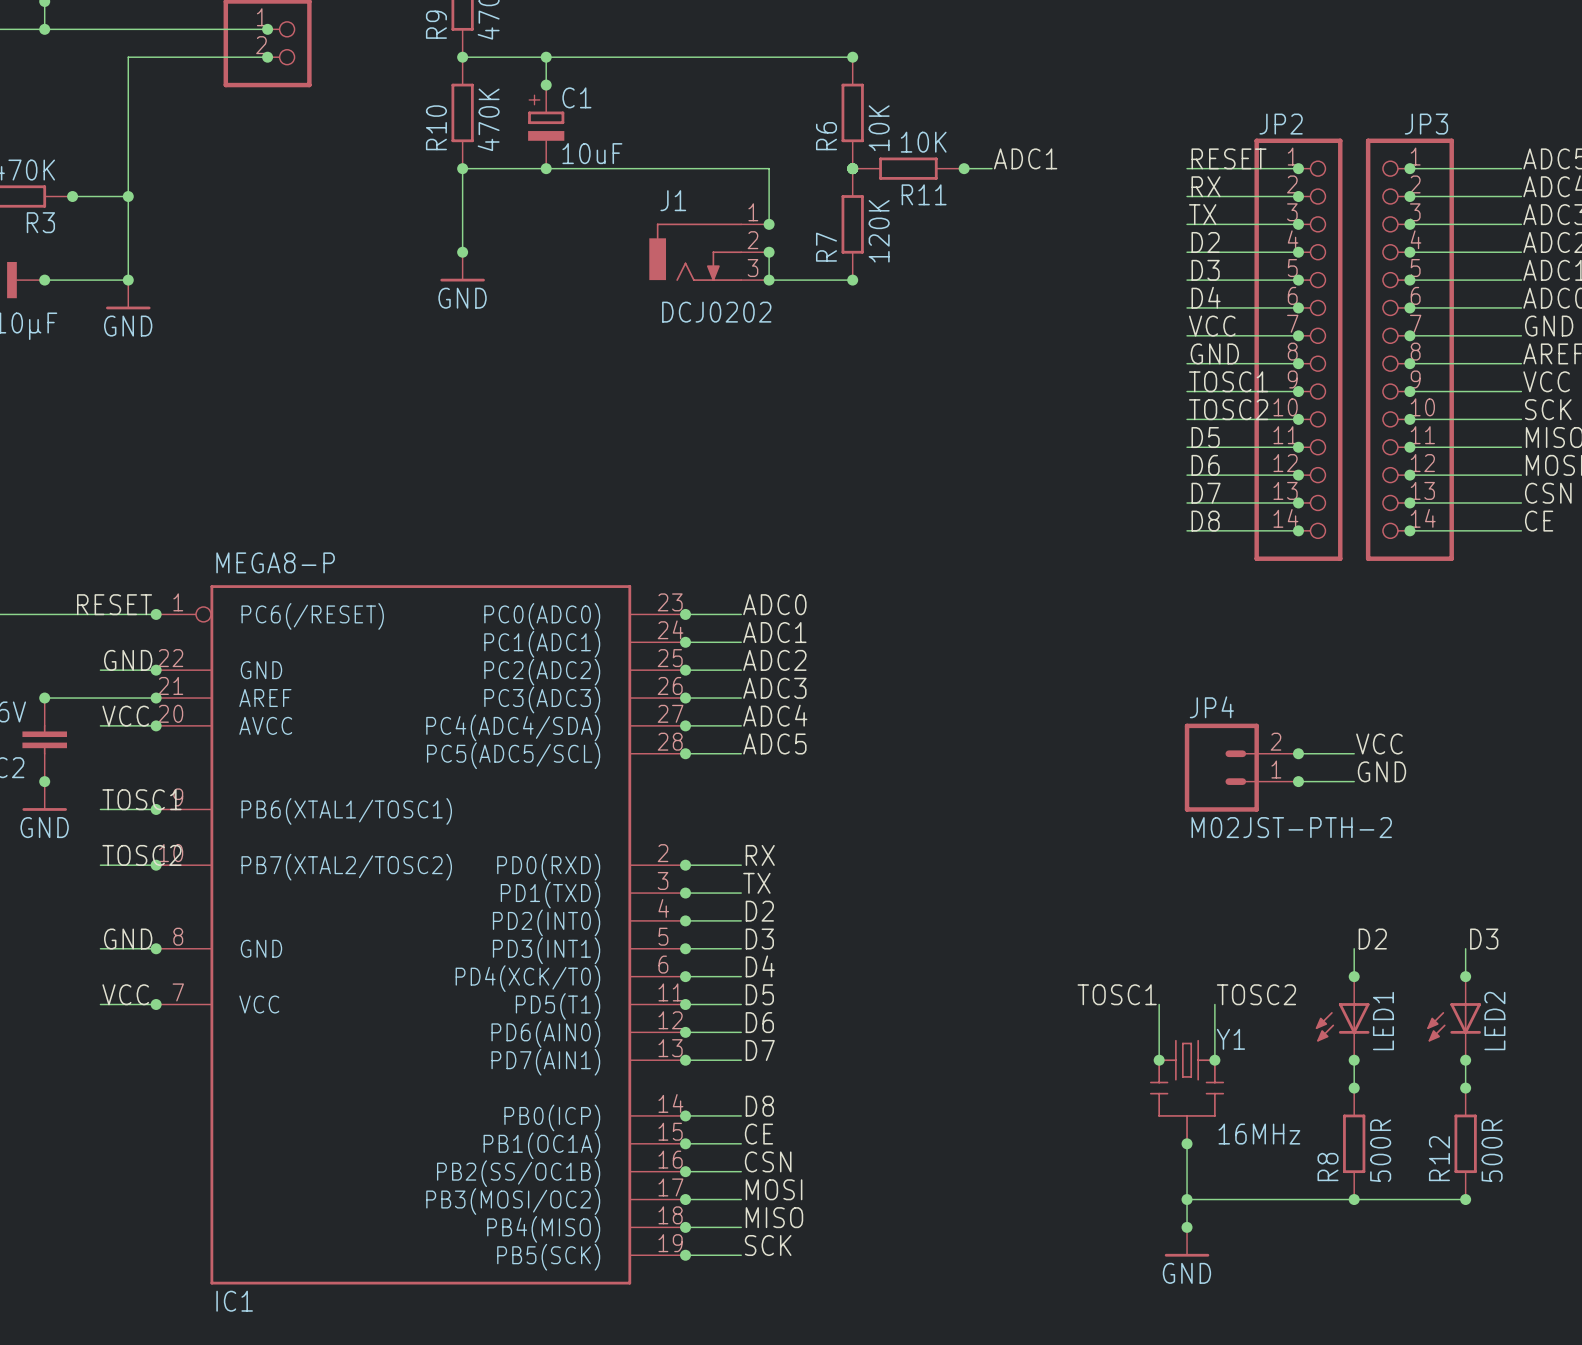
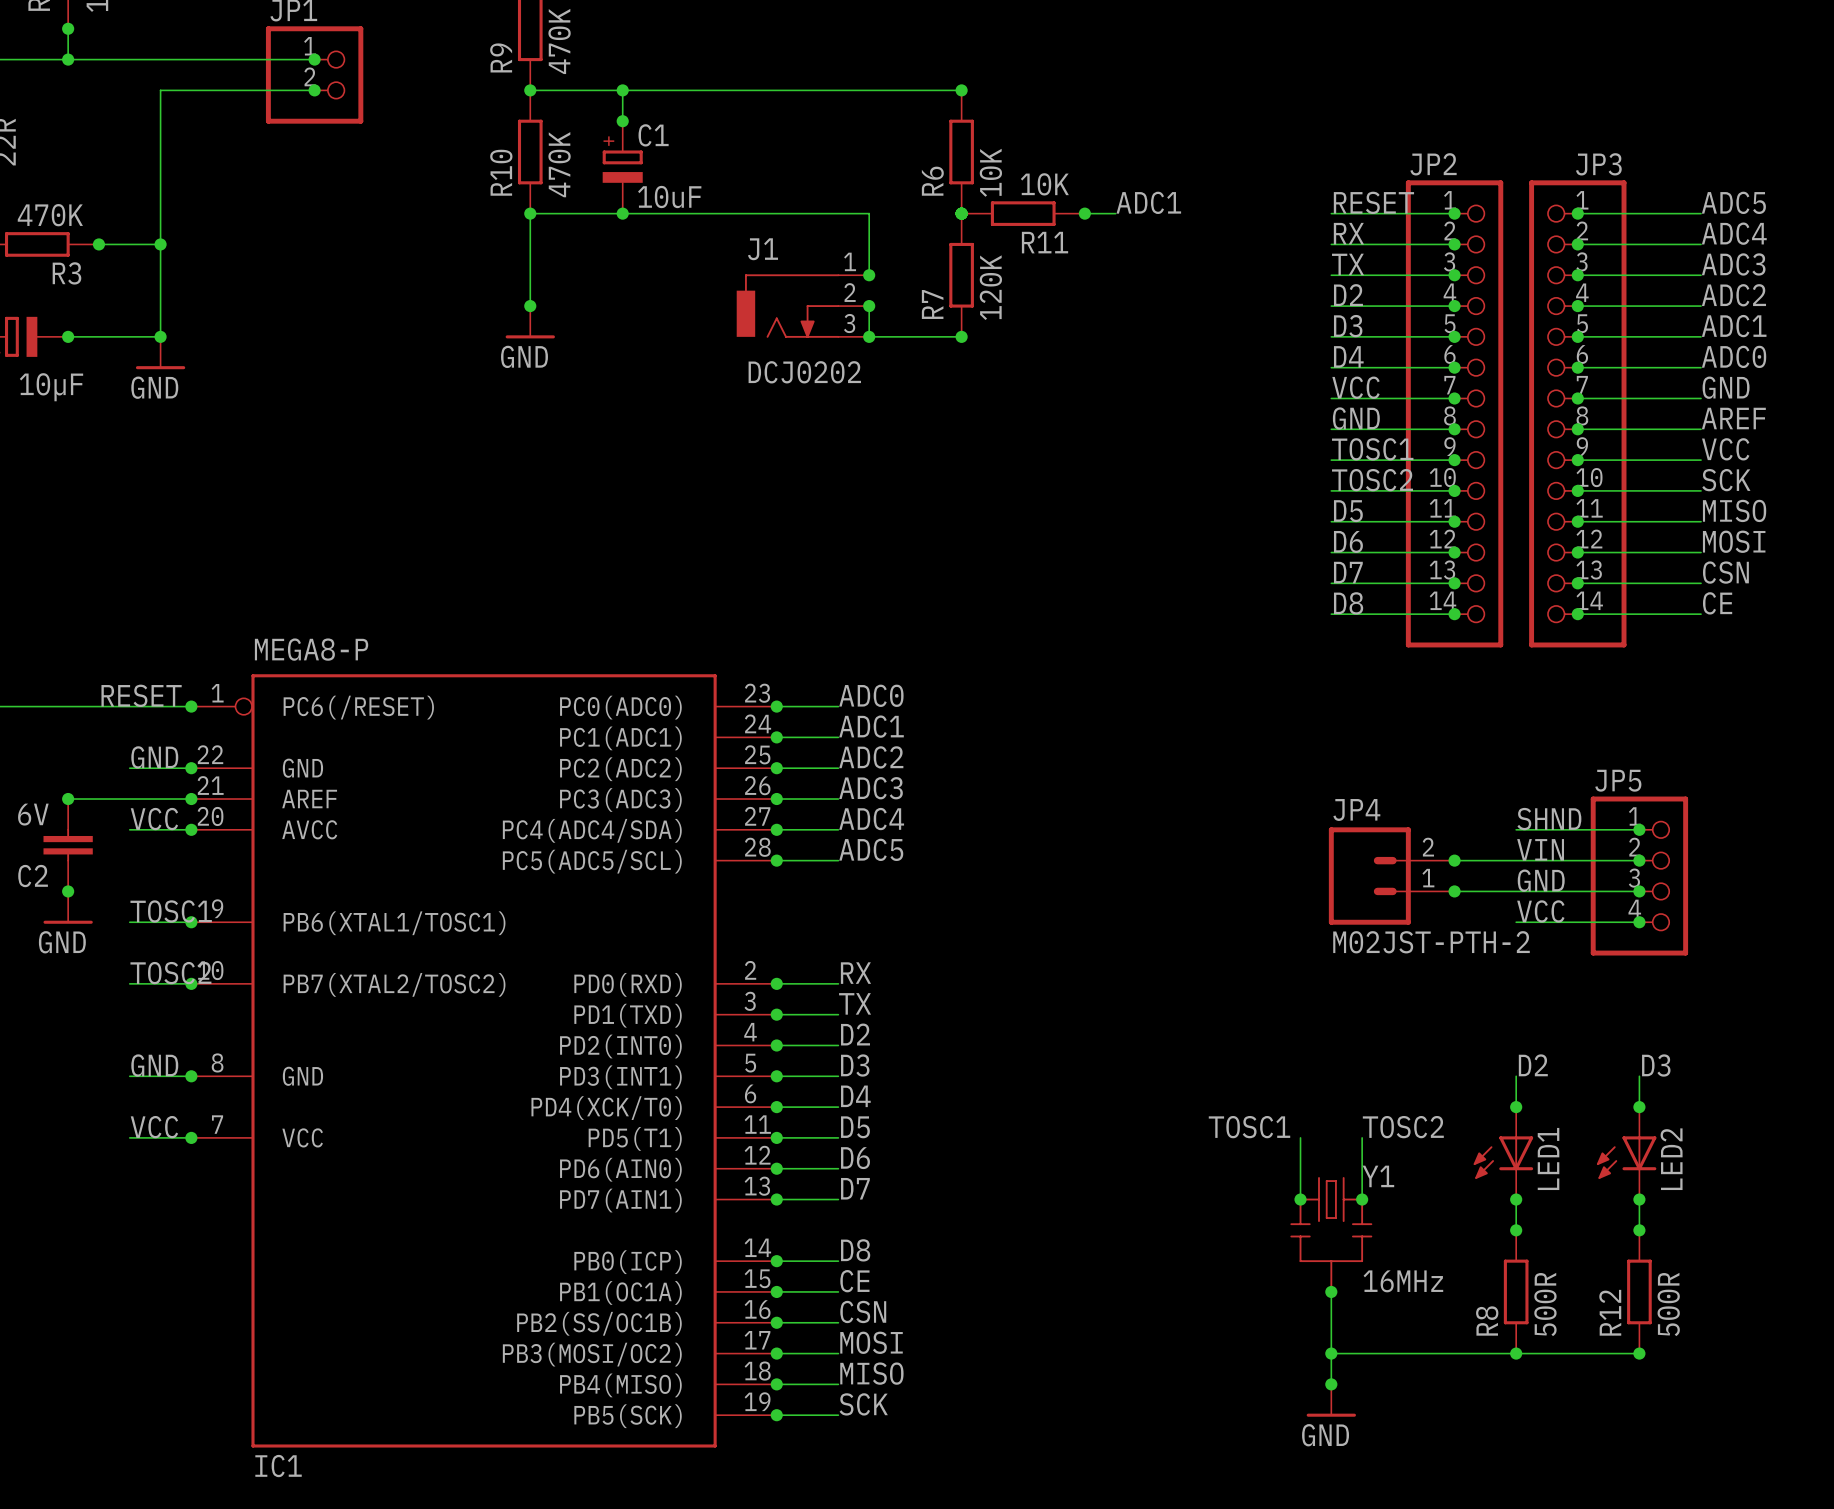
label: none -> SHND (1549, 819)
wire: none -> (1516, 829) (1639, 829)
junction: none -> (1639, 829)
label: VCC (1379, 743) -> VIN (1540, 849)
wire: none -> (1516, 860) (1639, 860)
junction: none -> (1639, 860)
JP5: none -> (1639, 876)
wire: none -> (1516, 891) (1639, 891)
junction: none -> (1639, 891)
label: none -> VCC (1540, 911)
wire: none -> (1516, 922) (1639, 922)
junction: none -> (1639, 922)

